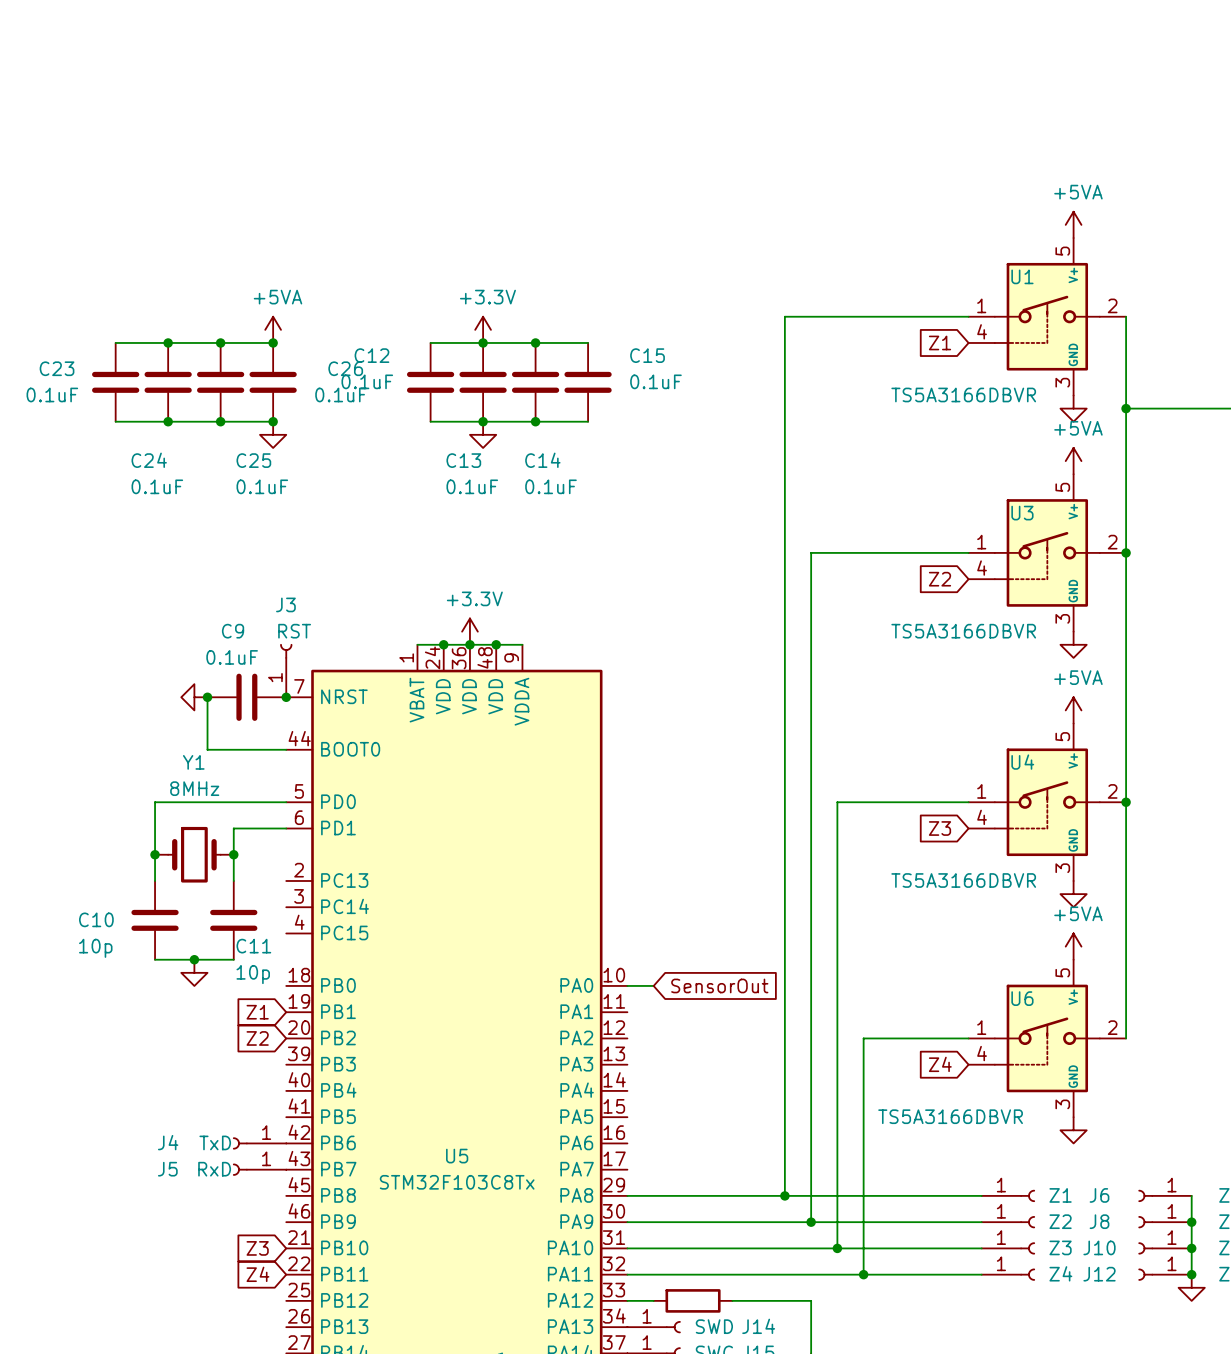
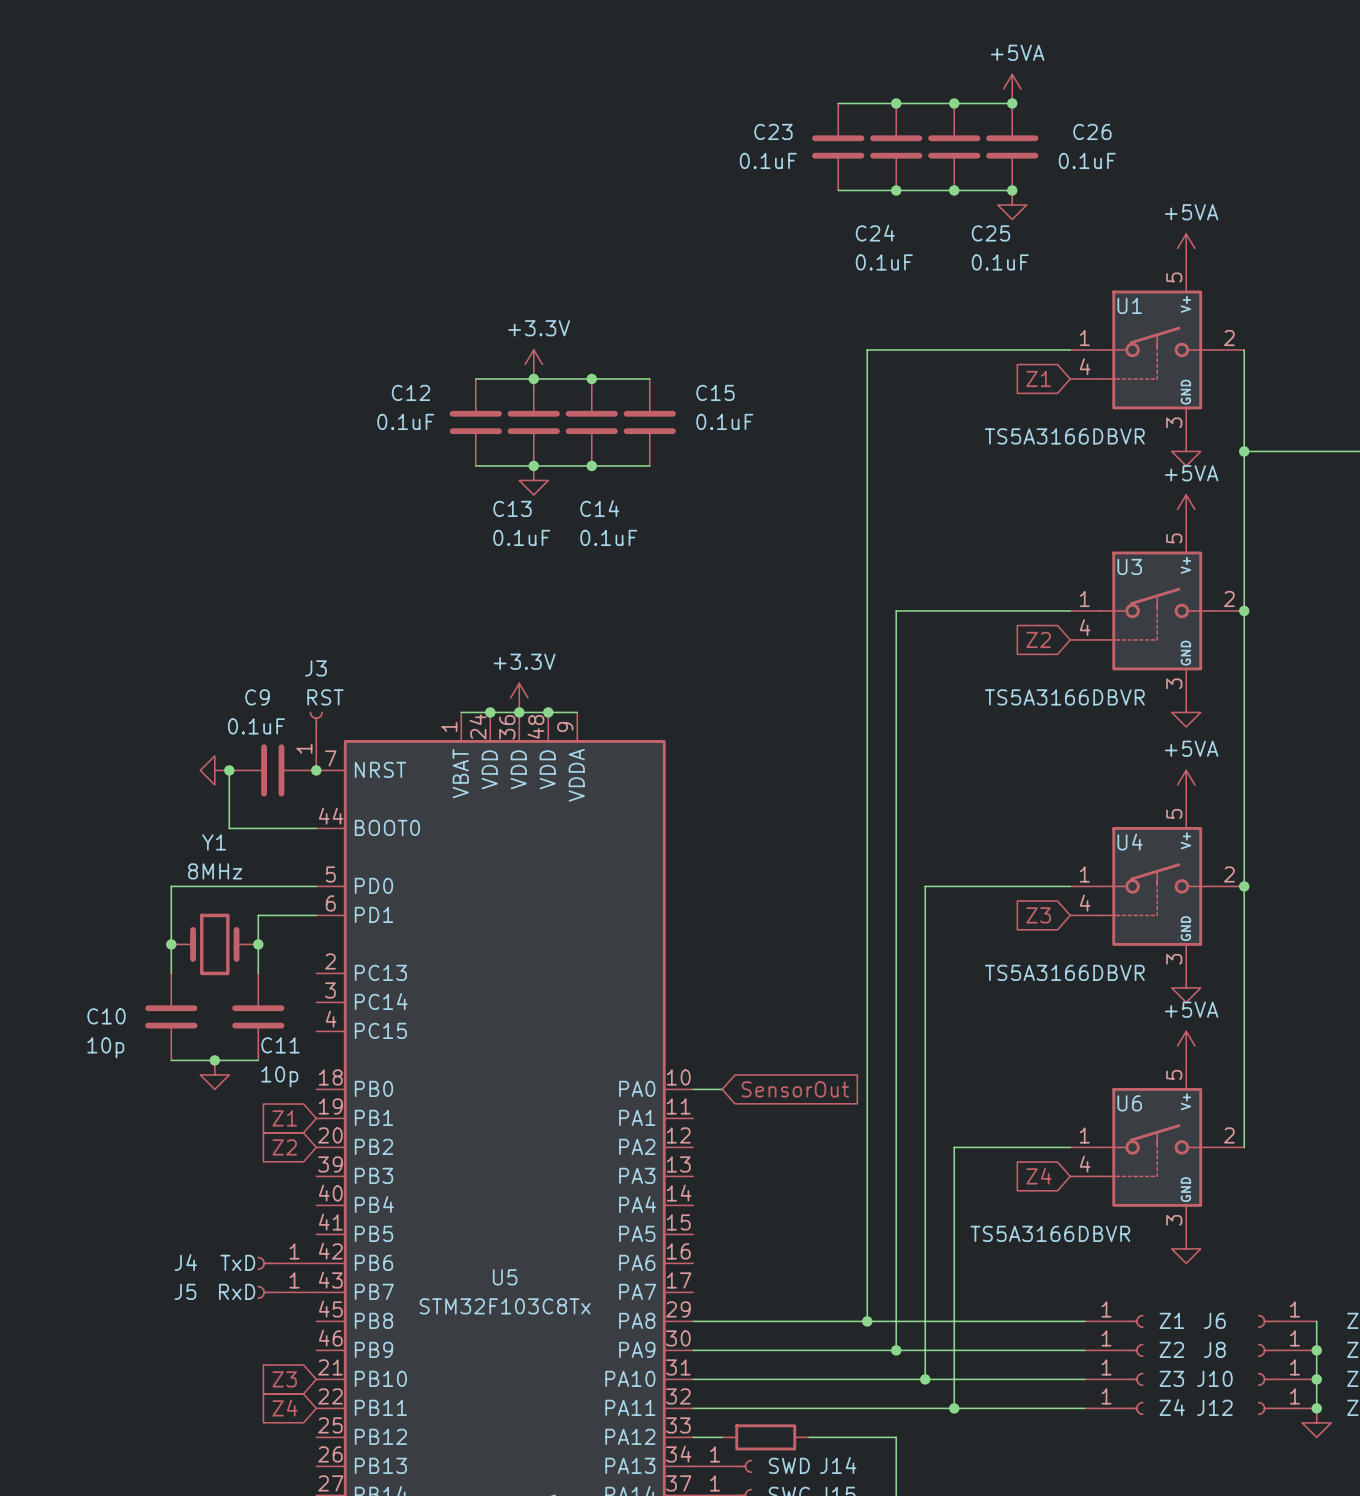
power symbol: none -> +5VA (1012, 88)
wire: none -> (838, 103) (1012, 103)
junction: none -> (896, 103)
junction: none -> (954, 103)
junction: none -> (1012, 103)
wire: none -> (838, 190) (1012, 190)
junction: none -> (896, 190)
junction: none -> (954, 190)
junction: none -> (1012, 190)
power symbol: none -> (1012, 204)
power symbol: +5VA (273, 329) -> none
wire: (115, 342) (273, 342) -> none
junction: (168, 342) -> none
junction: (220, 342) -> none
junction: (273, 342) -> none
C23 position: (115, 382) -> (838, 146)
C24 position: (168, 382) -> (896, 146)
C25 position: (220, 382) -> (954, 146)
C26 position: (273, 382) -> (1012, 146)
wire: (115, 421) (273, 421) -> none
junction: (168, 421) -> none
junction: (220, 421) -> none
junction: (273, 421) -> none
power symbol: (273, 434) -> none

